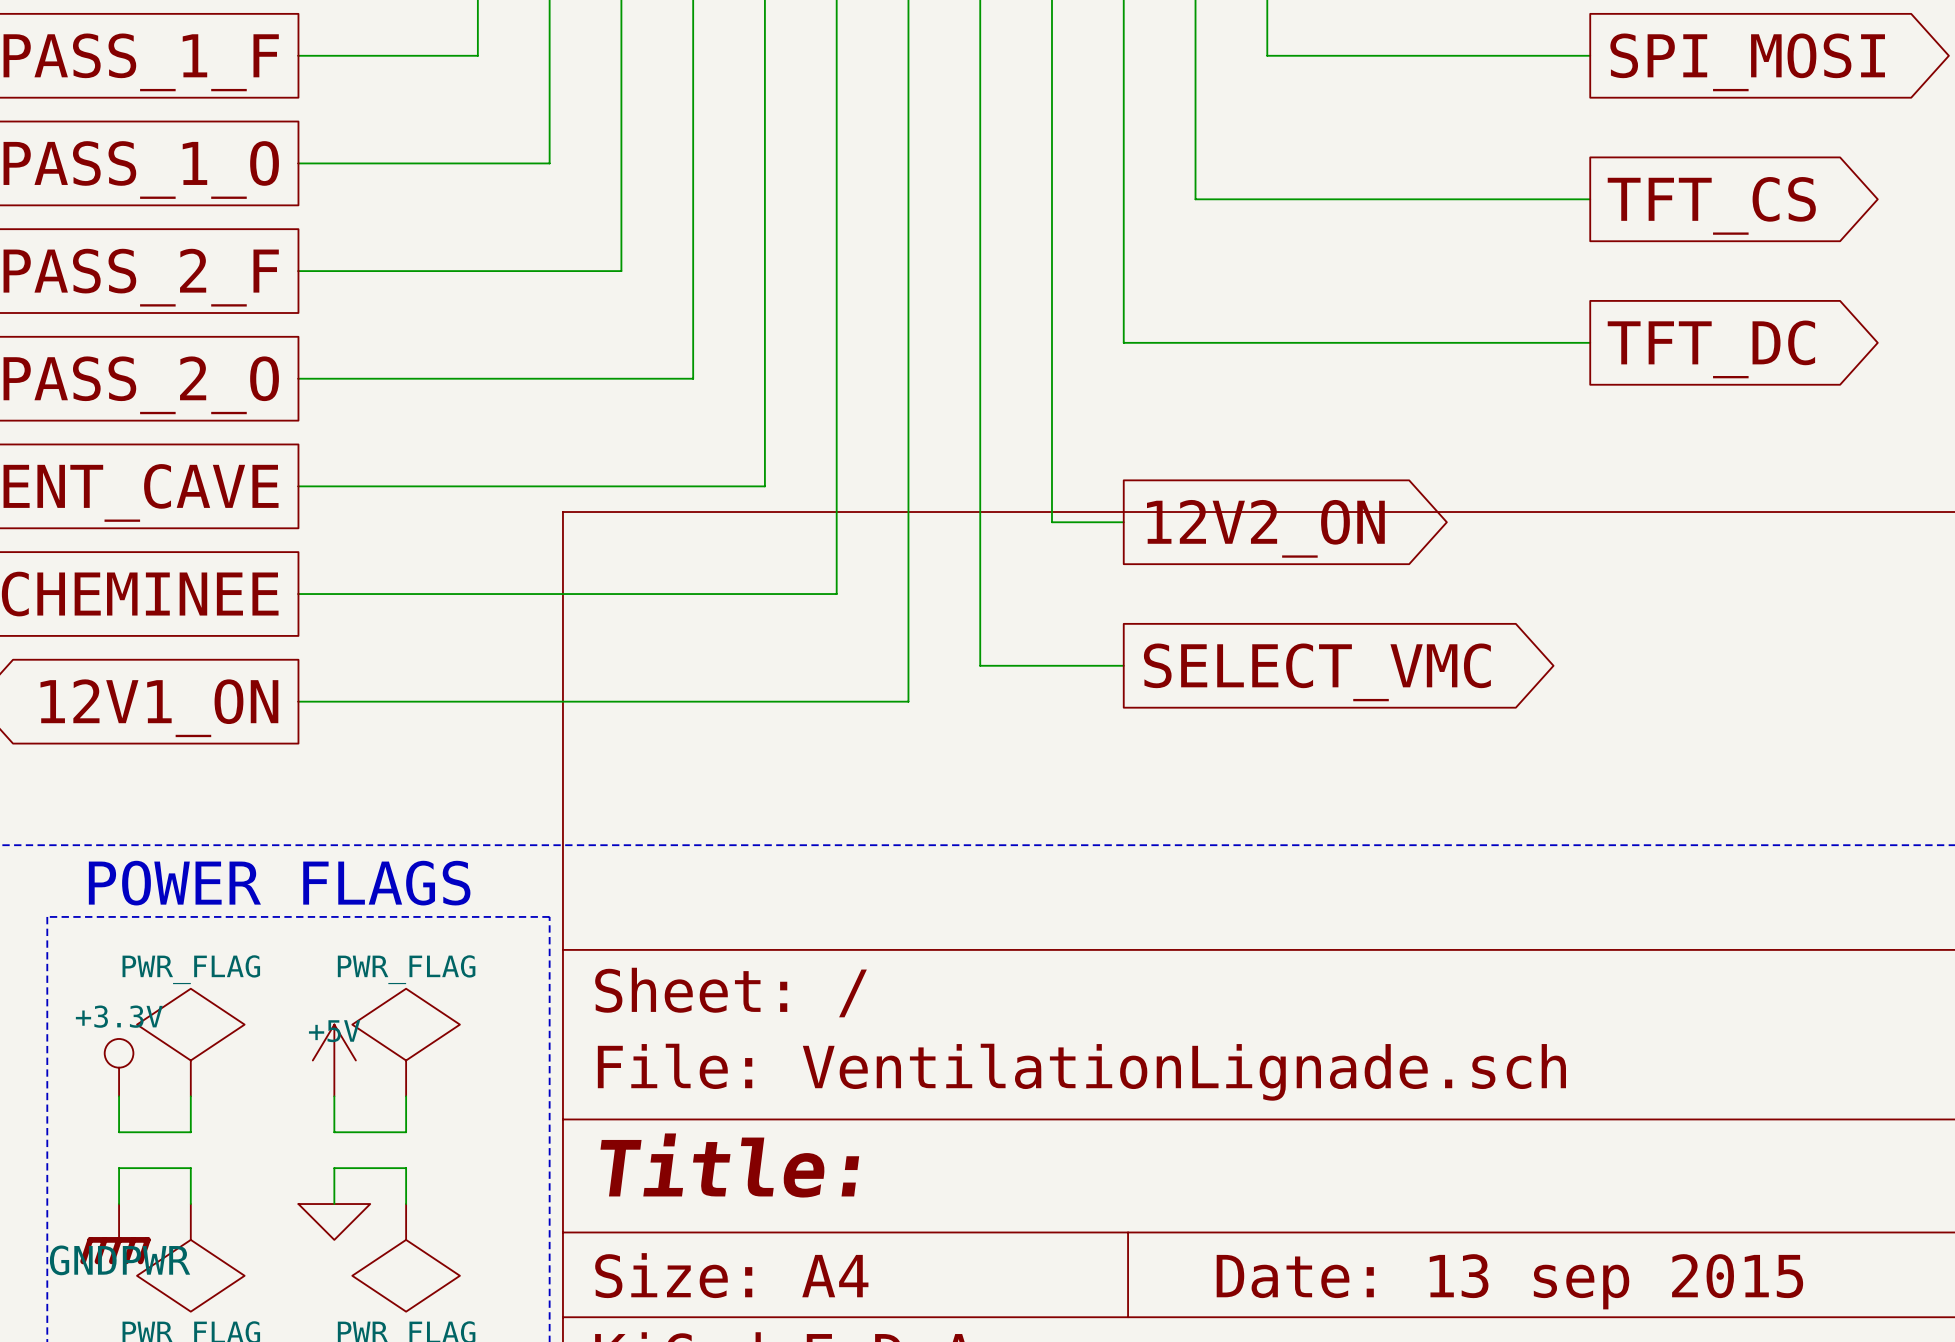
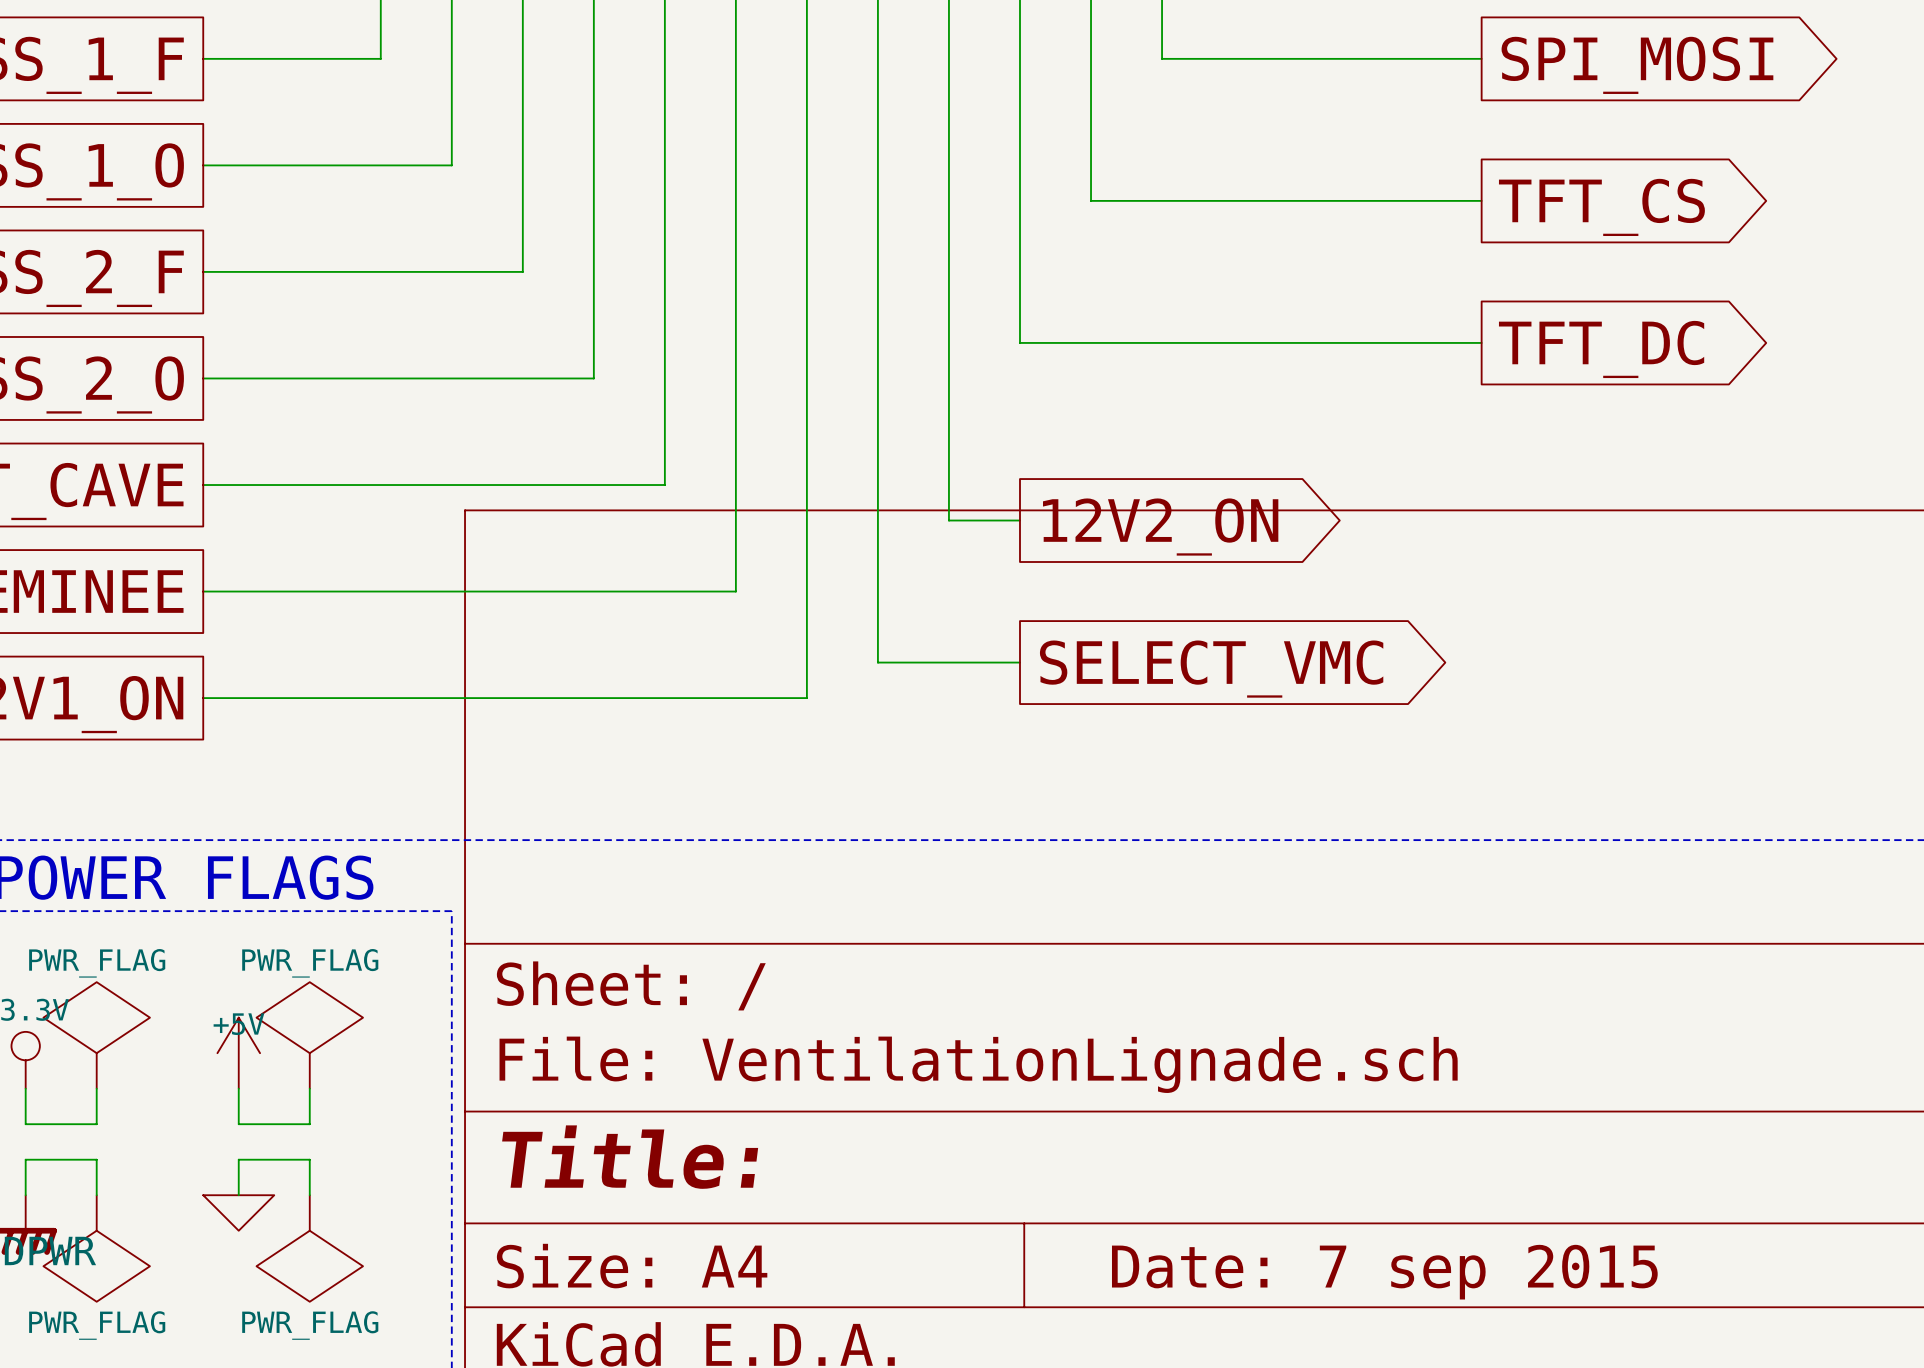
title block: Date: 13 sep 2015 (1509, 1281) -> Date: 7 sep 2015 (1384, 1272)

